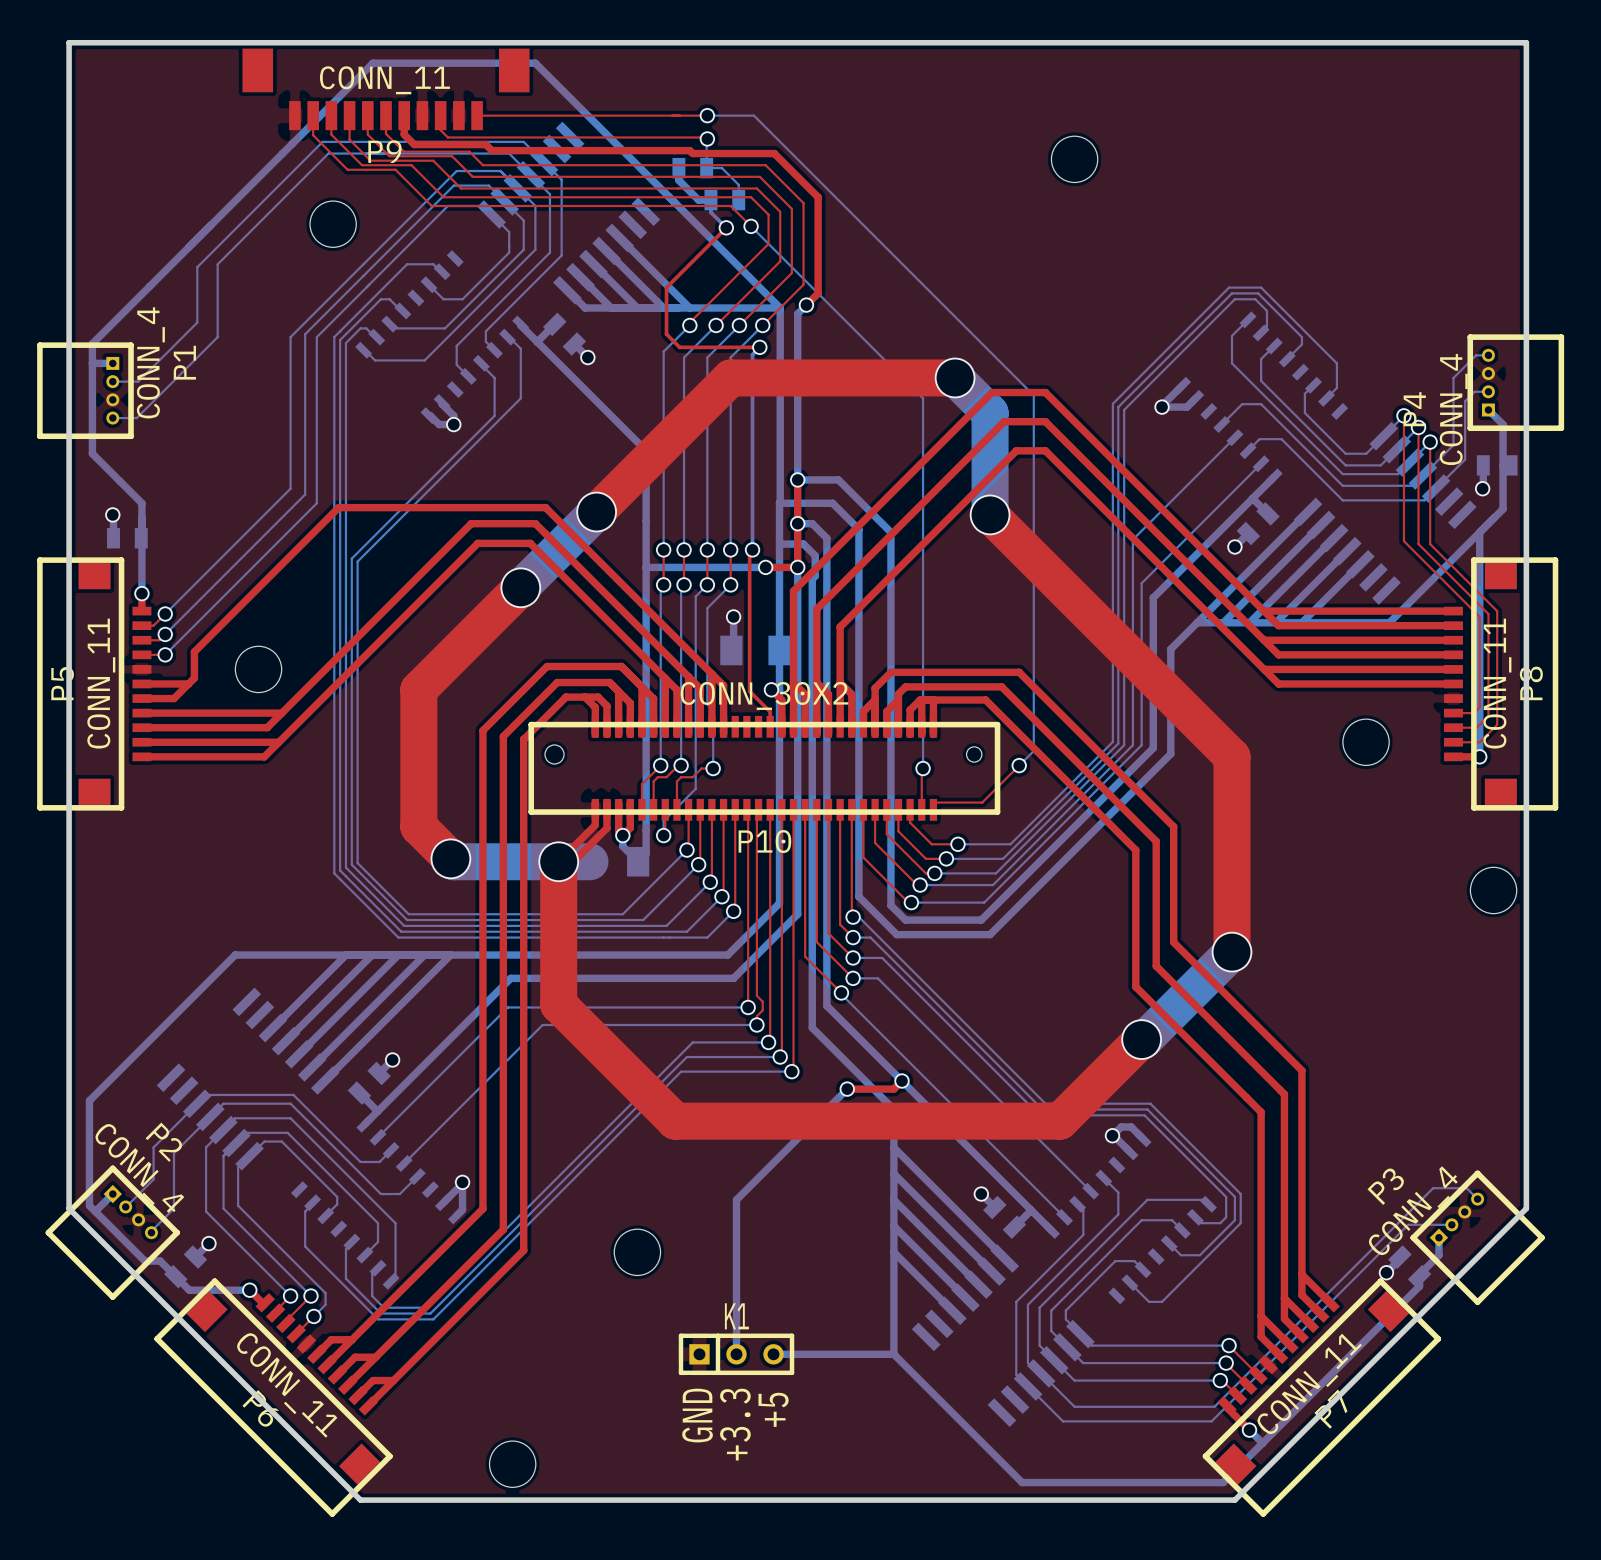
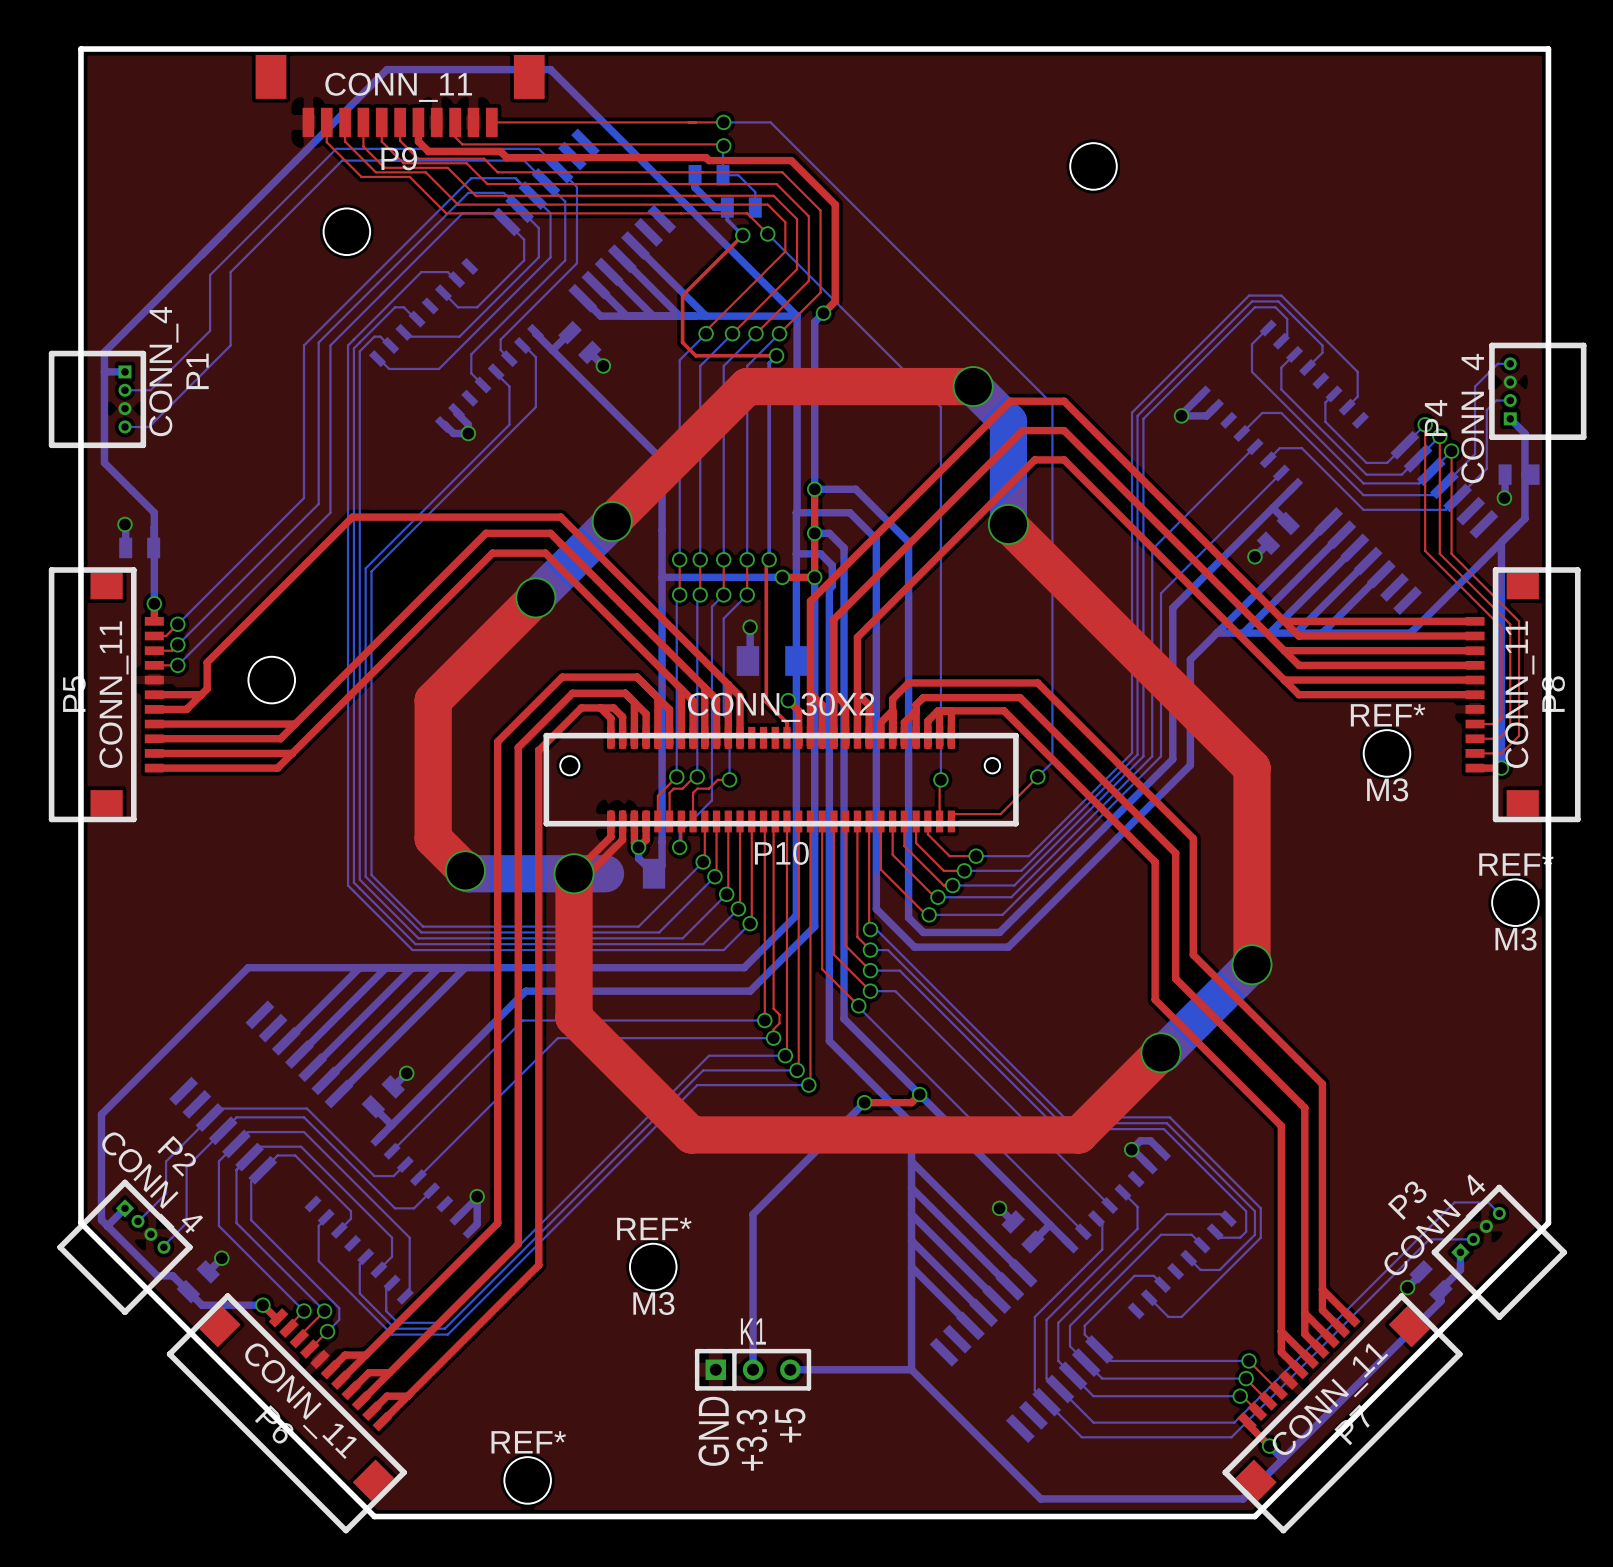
REF* name: none -> REF* (1388, 715)
REF* value: none -> M3 (1387, 789)
REF* name: none -> REF* (1516, 864)
REF* value: none -> M3 (1516, 939)
REF* name: none -> REF* (654, 1228)
REF* value: none -> M3 (653, 1303)
REF* name: none -> REF* (528, 1442)

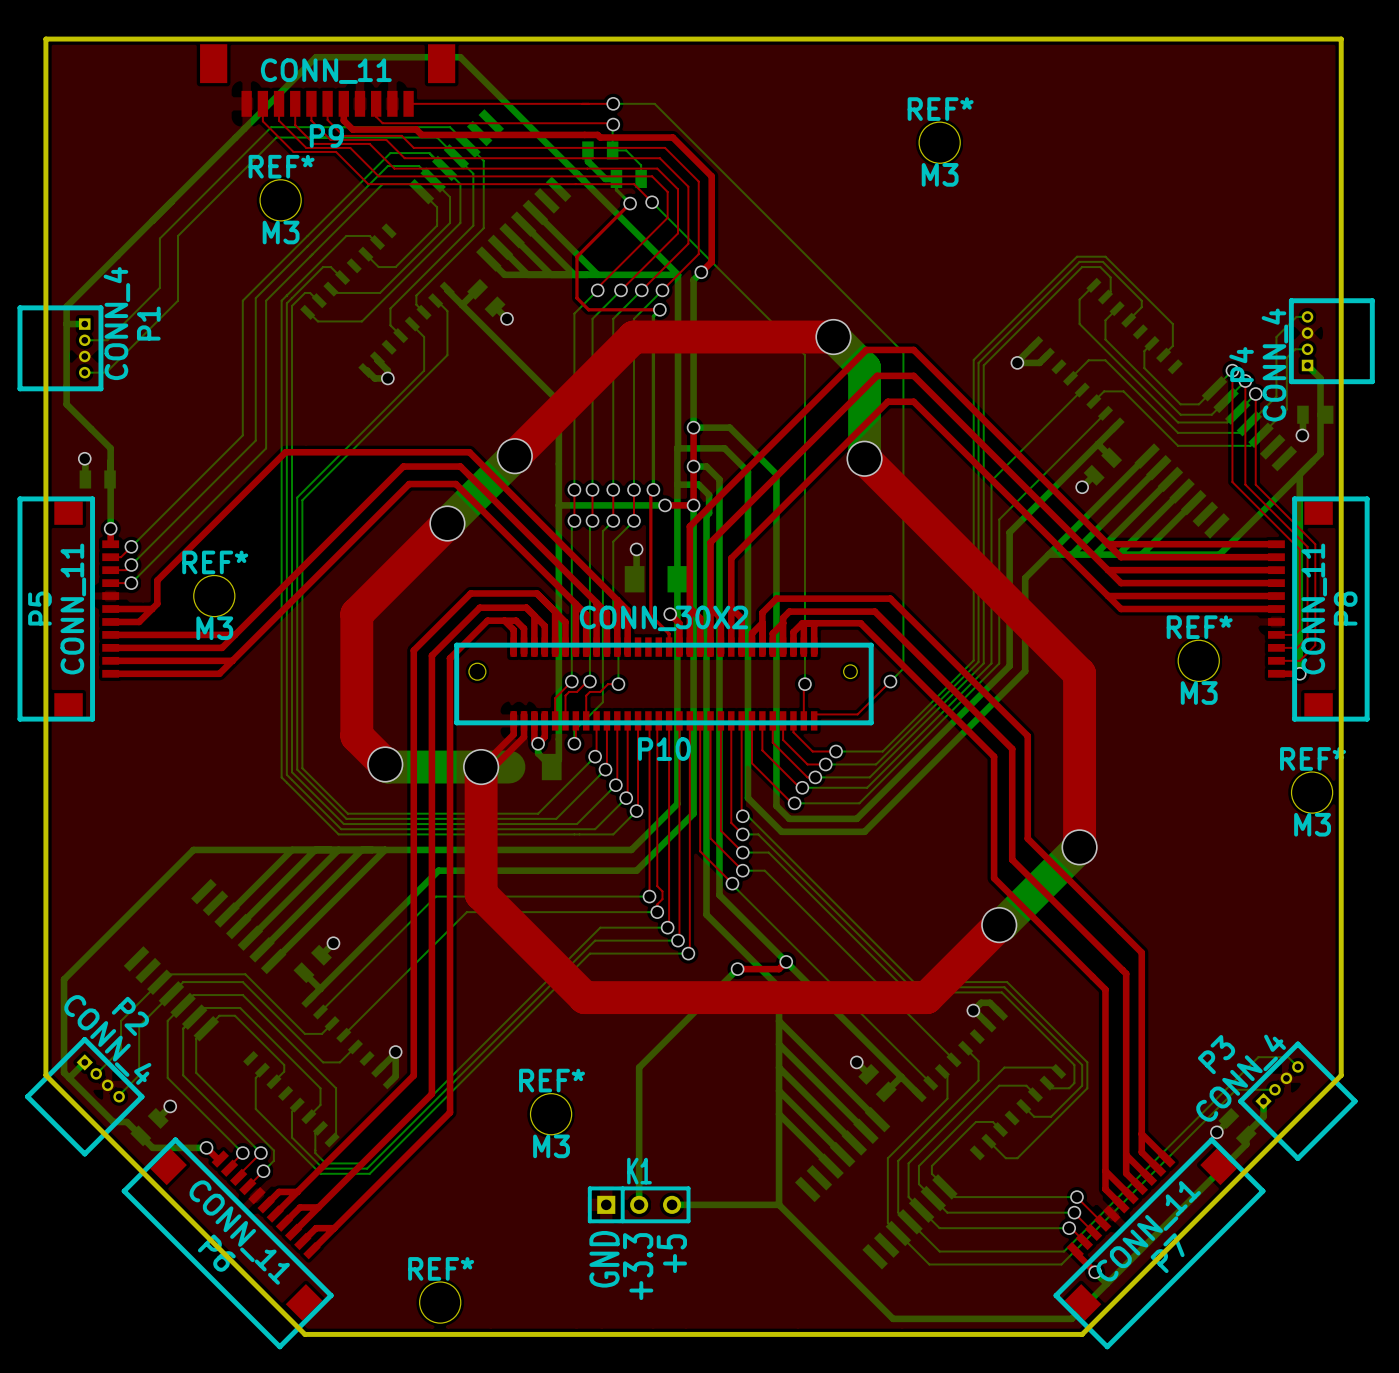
REF* name: none -> REF* (940, 109)
REF* name: none -> REF* (281, 166)
REF* value: none -> M3 (940, 174)
REF* value: none -> M3 (281, 232)
REF* name: none -> REF* (215, 562)
REF* value: none -> M3 (214, 628)

